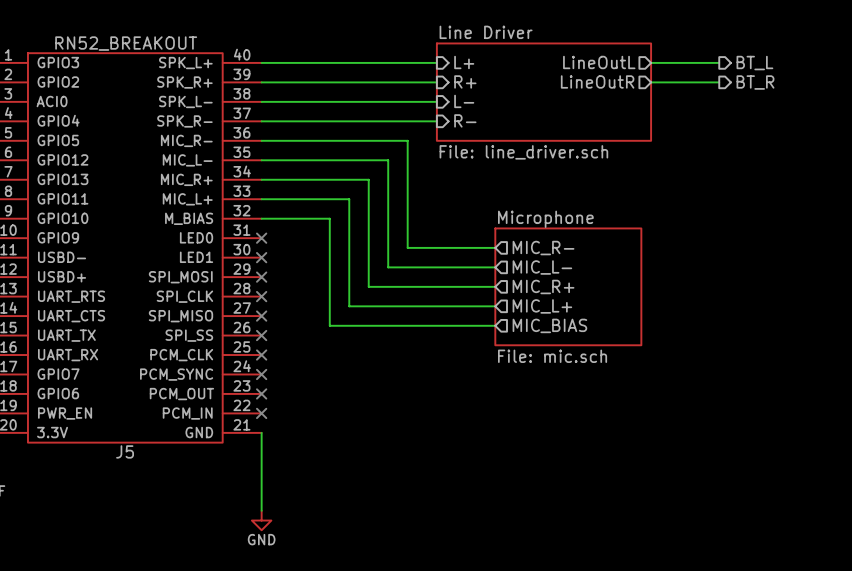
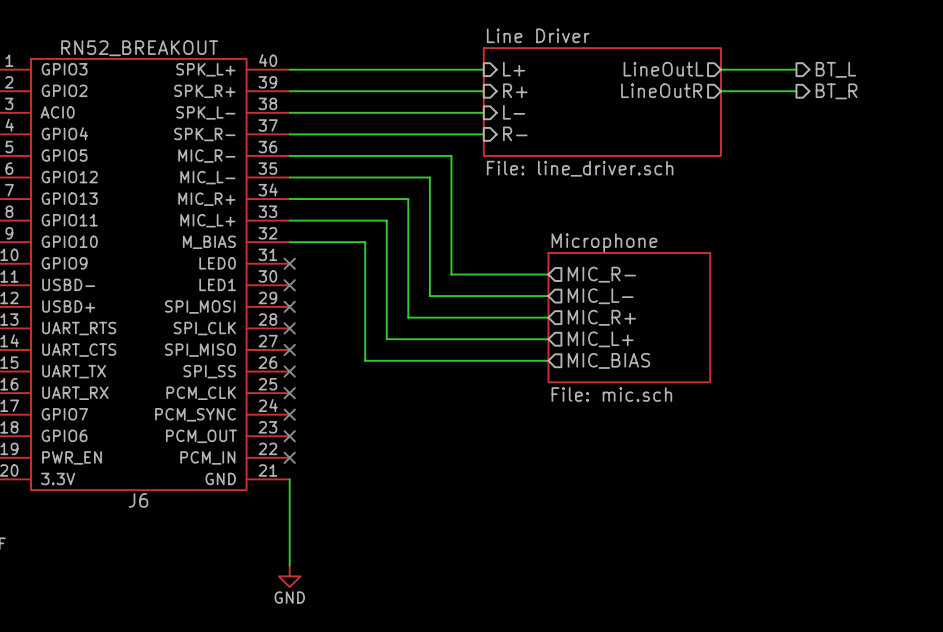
J5 name: J5 (125, 451) -> J6 (138, 500)

